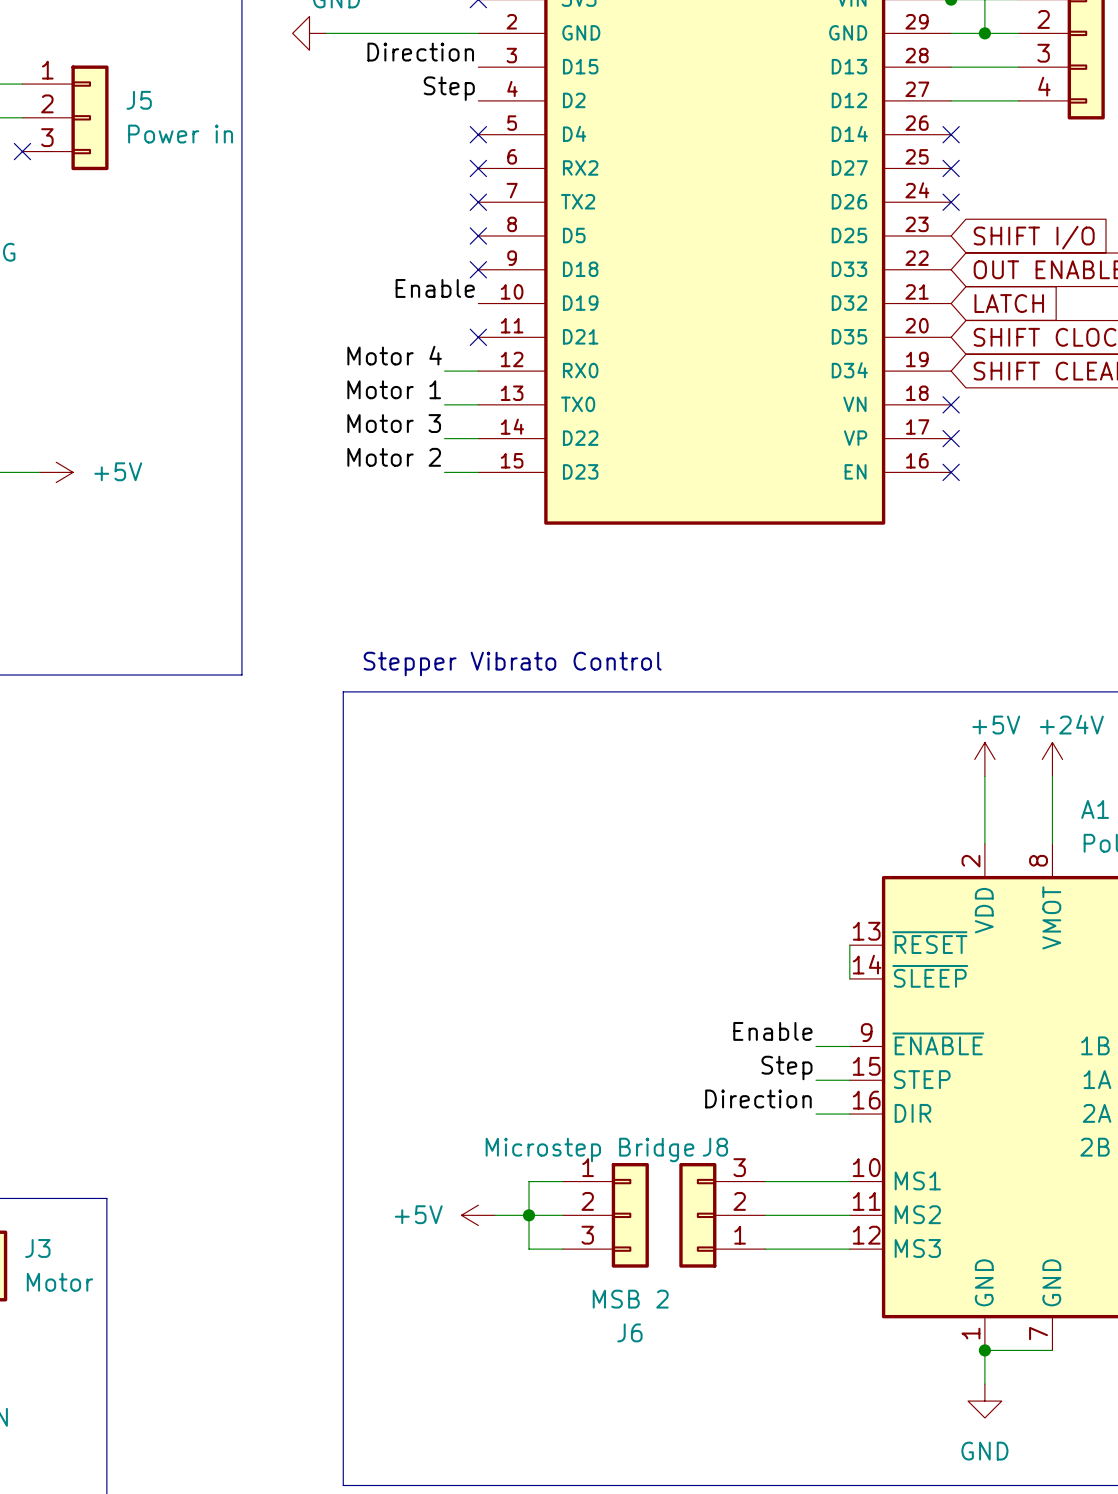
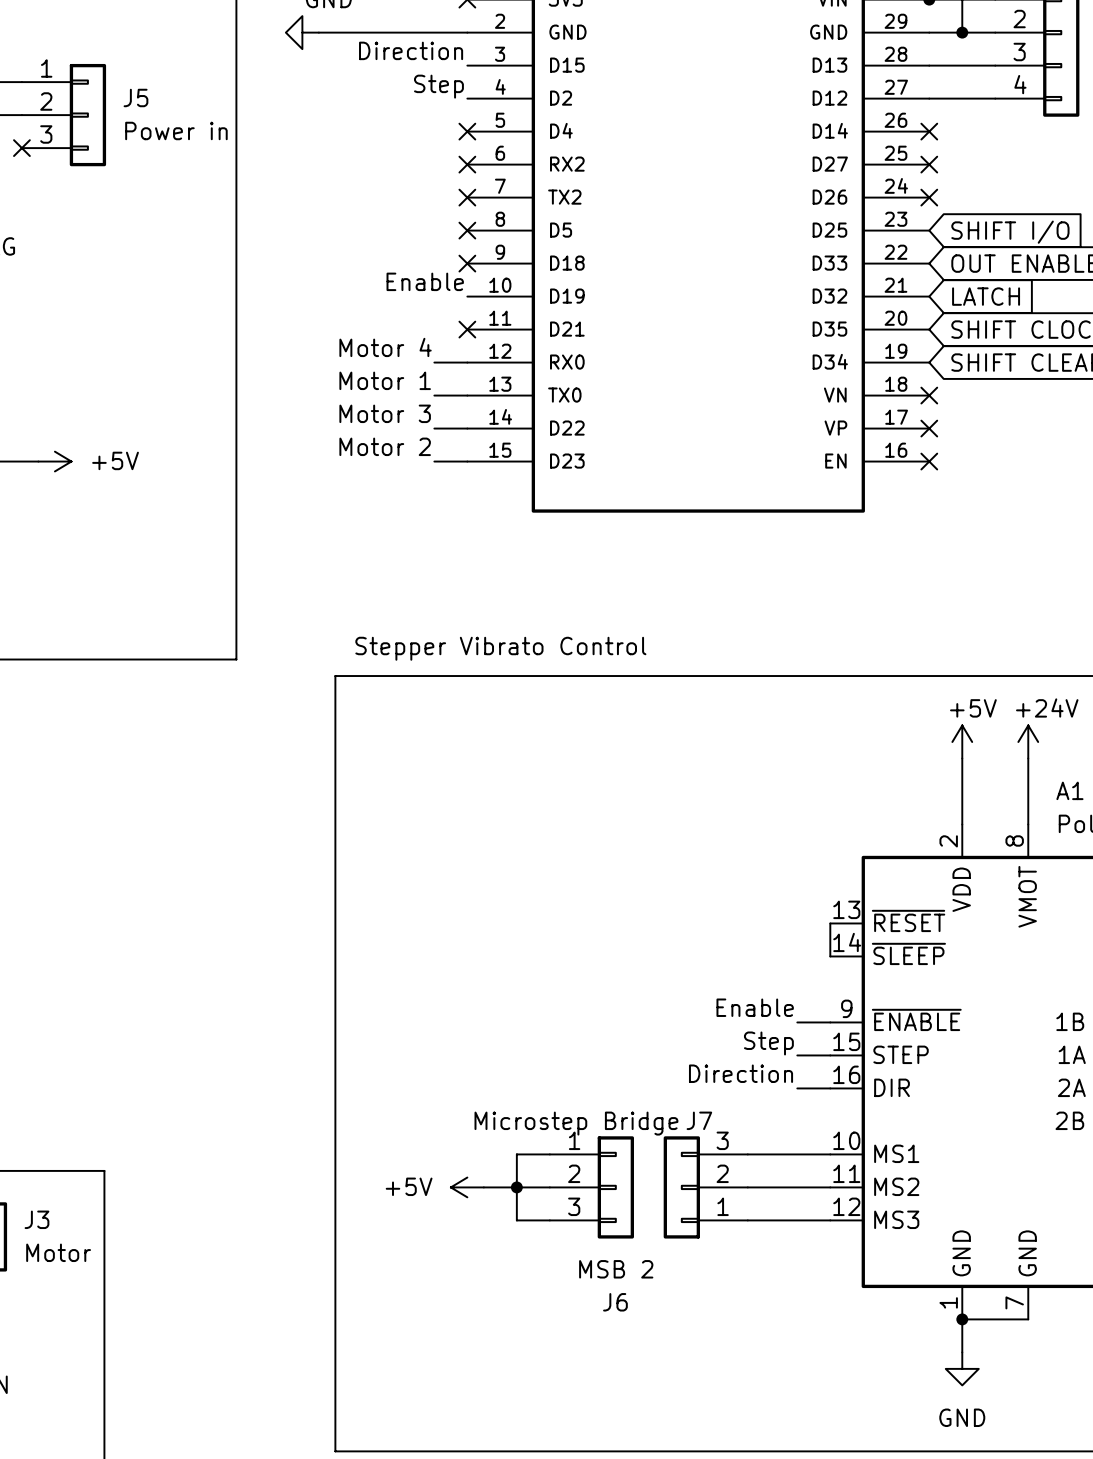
J8 name: J8 (715, 1147) -> J7 (699, 1120)

